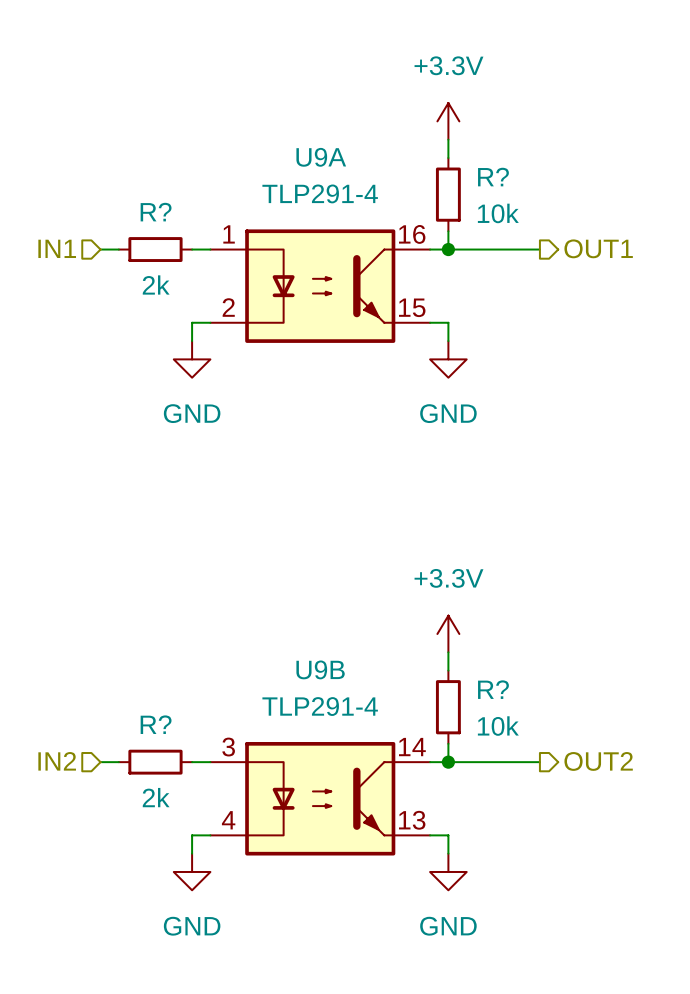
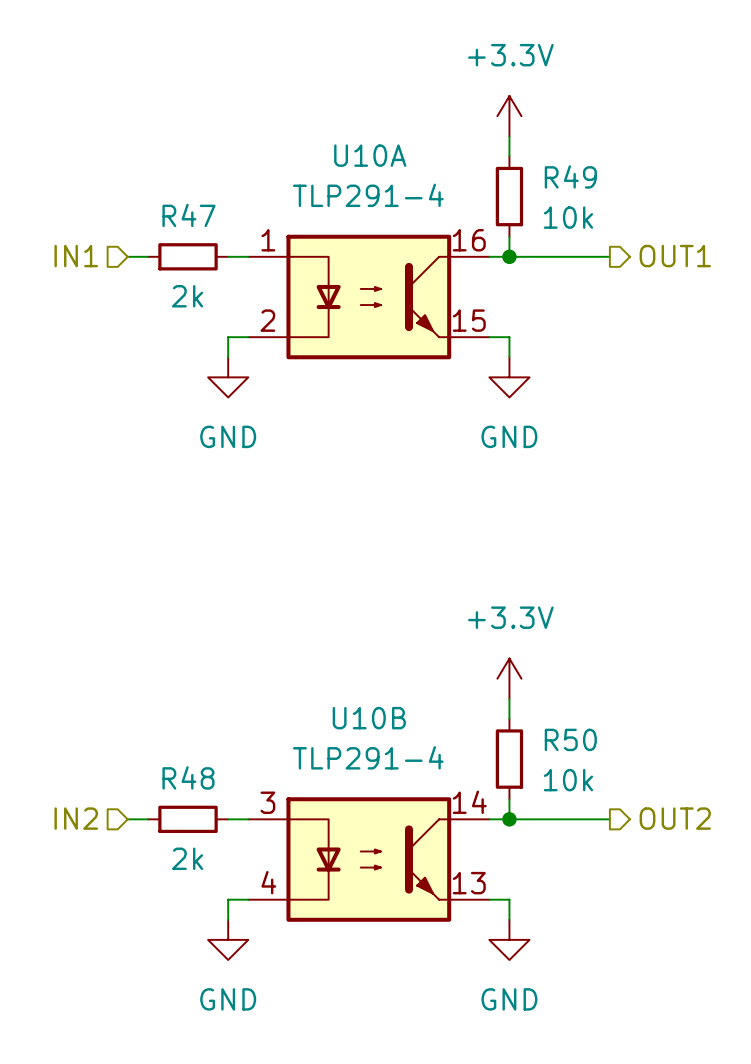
U9A name: U9A (321, 157) -> U10A (370, 155)
R? name: R? (493, 177) -> R49 (570, 176)
R? name: R? (156, 212) -> R47 (188, 215)
U9B name: U9B (320, 669) -> U10B (369, 718)
R? name: R? (493, 689) -> R50 (570, 739)
R? name: R? (156, 724) -> R48 (188, 777)

